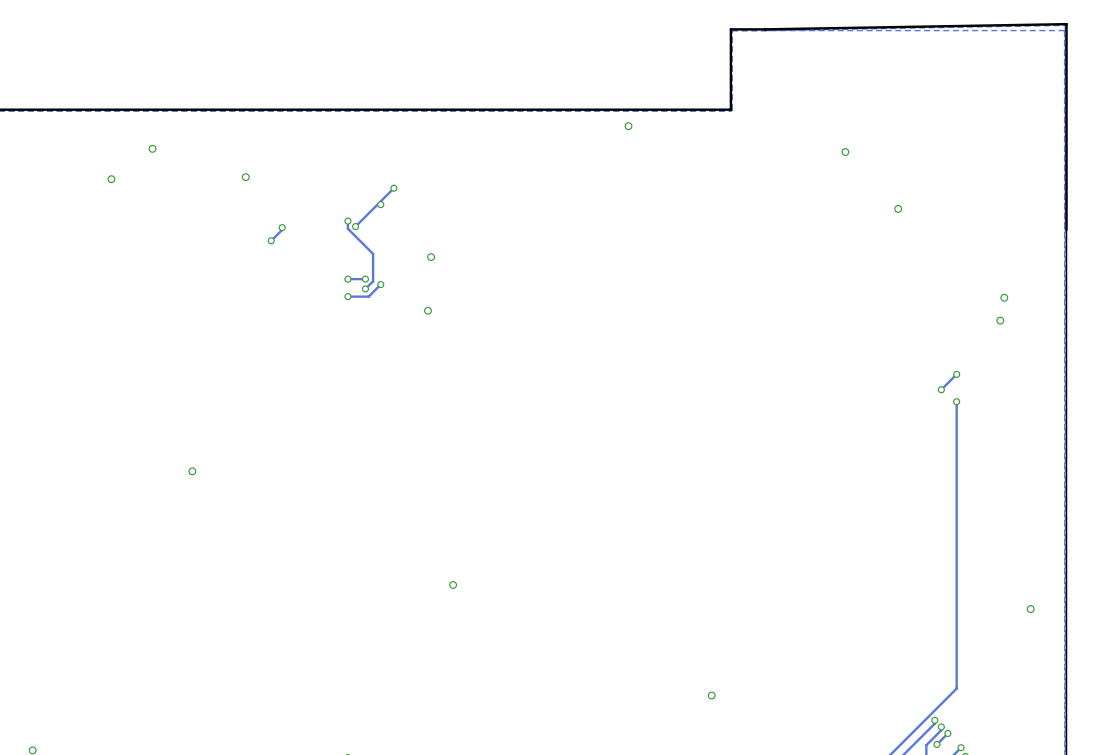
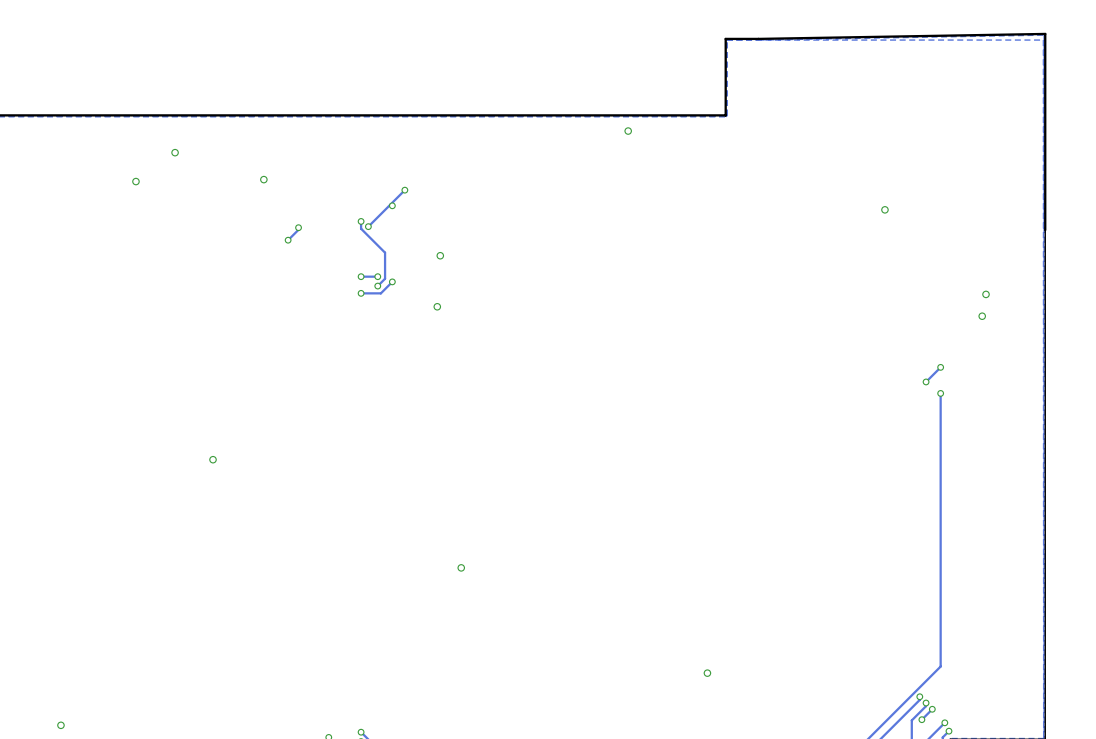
via: (845, 152) -> none
via: (1030, 609) -> none

